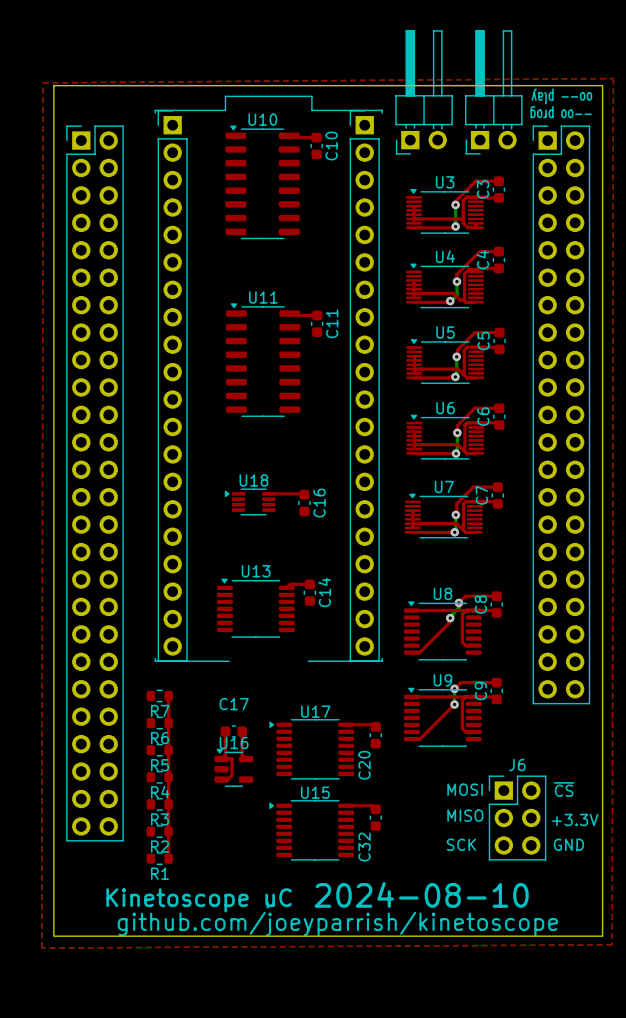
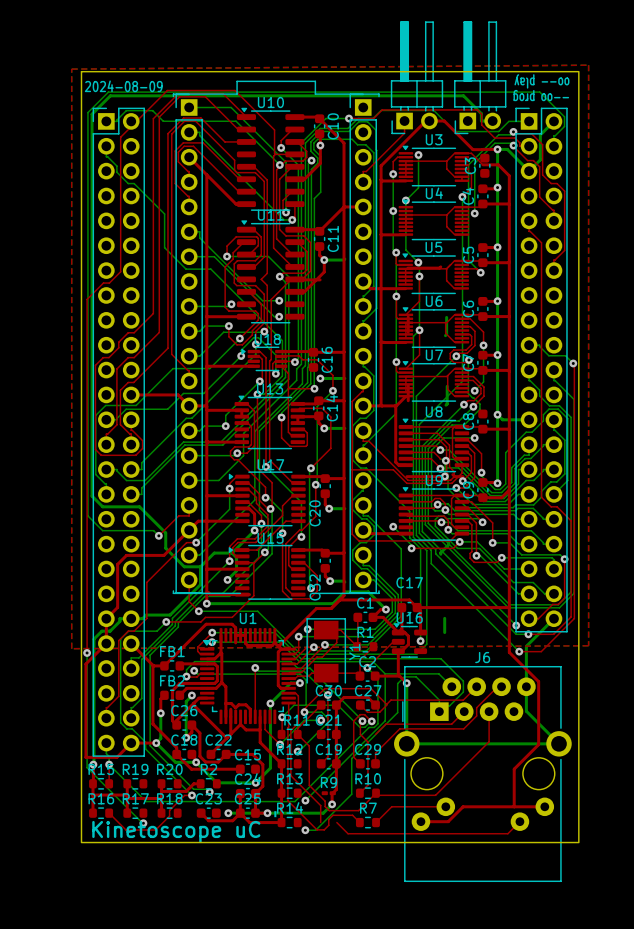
top zone outline: (613, 78) (612, 944) (41, 948) (43, 82) -> (588, 65) (588, 645) (71, 648) (71, 69)
text: none -> 2024-08-09 (123, 86)
bottom track: none -> (189, 107) (231, 107) (286, 162) (286, 212)
top track: none -> (246, 117) (222, 93) (178, 93) (153, 118) (153, 313) (134, 332) (128, 332) (118, 342) (118, 347) (108, 357) (103, 357) (95, 365) (95, 449) (101, 455) (135, 455) (142, 448) (142, 440) (131, 430) (131, 419)
top track: (289, 135) (291, 137) (316, 137) -> (294, 117) (317, 117) (344, 143) (344, 595) (331, 608) (316, 608) (278, 646)
top track: none -> (348, 118) (373, 118) (382, 109) (477, 109) (481, 114) (481, 124) (494, 138) (515, 138) (519, 142) (519, 146) (529, 146)
bottom track: none -> (348, 118) (325, 118) (301, 142) (301, 364) (296, 369) (296, 380) (243, 433) (243, 455) (218, 480) (189, 480)
via: none -> (348, 118)
bottom track: none -> (106, 121) (116, 121) (126, 110) (152, 110) (163, 121) (236, 121) (279, 165)
top track: none -> (404, 121) (404, 133) (366, 171) (363, 171) (363, 182)
bottom track: none -> (492, 121) (481, 121) (481, 113) (463, 95) (110, 95) (92, 114) (92, 496) (102, 506) (139, 506) (165, 532) (165, 548) (184, 566) (200, 566)
bottom track: none -> (529, 121) (508, 121) (498, 131) (454, 131) (433, 110) (381, 110) (373, 118) (358, 118) (348, 128) (320, 128) (305, 143) (305, 365) (302, 368) (302, 383) (254, 431) (254, 500) (199, 555) (189, 555)
bottom track: none -> (553, 121) (540, 134) (540, 159) (529, 171) (507, 149) (497, 149) (497, 483)
top track: none -> (246, 129) (238, 129) (205, 96) (179, 96) (159, 117) (159, 332) (134, 357) (128, 357) (116, 368) (116, 424) (106, 434) (106, 444)
top track: none -> (294, 129) (292, 129) (281, 140) (281, 147)
bottom track: none -> (189, 132) (199, 132) (199, 135) (284, 219) (292, 219)
top track: none -> (513, 131) (515, 134) (531, 134) (542, 144) (542, 174) (551, 183) (557, 183) (564, 191) (564, 250) (553, 260) (553, 270)
bottom track: none -> (513, 131) (510, 134) (498, 134) (468, 164) (468, 260) (480, 272)
via: none -> (513, 131)
top track: none -> (319, 133) (320, 163) (304, 179) (294, 179)
top track: none -> (246, 141) (224, 141) (201, 118) (183, 118) (167, 133) (167, 348) (133, 382) (128, 382) (120, 390) (120, 424) (131, 434) (131, 444)
top track: none -> (294, 141) (306, 151) (306, 157) (302, 161) (285, 161) (276, 169) (276, 238) (292, 254) (294, 254)
bottom track: none -> (106, 146) (106, 156) (116, 166) (116, 172) (128, 183) (134, 183) (164, 214) (164, 247) (186, 269) (210, 269) (282, 340) (282, 376) (264, 394) (257, 394)
via: none -> (320, 145)
top track: none -> (513, 145) (527, 160) (533, 160) (539, 166) (539, 197) (553, 210) (553, 220)
bottom track: none -> (513, 145) (511, 143) (494, 143) (474, 163) (474, 213)
via: none -> (513, 145)
bottom track: none -> (553, 146) (553, 135) (564, 126) (564, 116) (539, 92) (108, 92) (87, 112) (87, 515) (102, 530) (153, 530) (158, 535)
bottom track: none -> (281, 147) (298, 165) (298, 358) (294, 362)
via: none -> (281, 147)
top track: none -> (497, 149) (472, 149) (444, 121) (425, 121) (381, 165) (382, 405)
via: none -> (497, 149)
top track: none -> (275, 154) (274, 130) (235, 90) (167, 90) (120, 137) (120, 271) (109, 283) (103, 283) (87, 299) (87, 652)
top track: none -> (275, 154) (273, 156) (273, 248) (292, 266) (294, 266)
top track: none -> (275, 154) (294, 154)
bottom track: none -> (418, 154) (418, 187) (405, 200) (405, 250) (419, 263) (419, 330)
via: none -> (418, 154)
top track: none -> (189, 157) (236, 204) (246, 204)
top track: none -> (405, 157) (397, 157) (393, 161) (393, 174)
top track: (498, 181) (475, 181) (455, 201) (455, 204) -> none
bottom track: none -> (311, 160) (308, 163) (307, 382) (259, 430) (259, 510) (268, 519) (268, 548) (264, 552)
via: none -> (311, 160)
top track: none -> (446, 161) (405, 161) (405, 176)
top track: none -> (446, 161) (446, 168) (454, 176) (461, 176) (461, 180)
top track: none -> (446, 161) (454, 153) (471, 153) (482, 164) (498, 164) (509, 175) (509, 652) (538, 681) (538, 744) (514, 769) (514, 806)
via: none -> (279, 165)
top track: none -> (246, 166) (254, 166) (267, 180) (267, 273) (261, 279) (267, 285) (267, 328) (264, 331)
top track: none -> (294, 166) (292, 166) (279, 179) (279, 229) (285, 235) (303, 235) (310, 242) (310, 271) (302, 279) (291, 279) (271, 299) (269, 459) (292, 482) (298, 482)
top track: none -> (461, 172) (471, 174) (471, 187) (462, 196)
top track: (498, 197) (466, 197) (463, 200) (463, 223) (467, 227) (475, 227) (475, 223) -> none
bottom track: none -> (393, 174) (393, 249) (396, 252) (396, 413) (363, 445) (363, 455)
via: none -> (393, 174)
top track: none -> (206, 174) (206, 603)
top track: none -> (246, 179) (239, 179) (203, 142) (183, 142) (175, 150) (175, 183) (189, 196) (189, 206)
top track: none -> (381, 179) (405, 180)
bottom track: (455, 204) (455, 226) -> none
via: (455, 204) -> none
top track: (413, 206) (413, 222) -> none
top track: none -> (189, 182) (189, 171) (178, 161) (178, 152) (184, 146) (193, 146) (238, 191) (246, 191)
U3 position: (444, 211) -> (433, 166)
top track: none -> (497, 187) (482, 188)
via: none -> (497, 187)
top track: none -> (294, 191) (291, 191) (283, 200) (283, 209) (286, 212)
top track: (413, 218) (463, 218) -> none
via: none -> (462, 196)
bottom track: none -> (462, 197) (462, 381) (419, 424) (419, 533) (435, 549) (435, 553) (516, 634) (528, 634)
top track: (455, 226) (413, 227) -> none
via: (455, 226) -> none
via: none -> (405, 200)
top track: none -> (294, 204) (294, 217) (292, 219)
top track: none -> (509, 204) (482, 203) (479, 207) (454, 207) (446, 214)
top track: none -> (363, 206) (344, 206) (319, 231) (317, 229) (294, 229)
via: none -> (393, 211)
via: none -> (286, 212)
via: none -> (474, 213)
top track: none -> (446, 214) (446, 226) (454, 234) (461, 234)
top track: none -> (446, 214) (405, 214) (405, 230)
via: none -> (292, 219)
top track: none -> (529, 220) (529, 231) (541, 242) (541, 497) (551, 506) (557, 506) (571, 520) (571, 616) (553, 634) (528, 634)
top track: (498, 251) (479, 251) (456, 274) (456, 281) -> none
top track: none -> (246, 229) (253, 229) (261, 237) (261, 254) (255, 260) (237, 260) (234, 263) (234, 283) (236, 285) (255, 285) (264, 294) (264, 322) (255, 331) (255, 344)
C4 position: (498, 260) -> (482, 196)
bottom track: none -> (189, 231) (199, 231) (199, 237) (262, 300) (279, 300)
top track: none -> (381, 234) (405, 234)
top track: (498, 268) (479, 268) (475, 271) -> none
top track: (478, 269) (469, 269) (464, 273) (464, 301) (475, 302) -> none
top track: none -> (246, 242) (243, 242) (233, 252) (233, 259) (225, 267) (225, 307) (228, 311) (255, 311) (258, 313) (258, 320) (239, 338)
top track: none -> (294, 242) (297, 242) (307, 251) (307, 269) (303, 273) (283, 273) (279, 276)
top track: none -> (319, 246) (319, 255) (324, 260) (324, 272) (304, 291) (294, 291)
top track: none -> (497, 247) (482, 247)
via: none -> (497, 247)
top track: (413, 280) (413, 297) -> none
bottom track: (456, 281) (456, 295) (450, 301) -> none
via: (456, 281) -> none
top track: none -> (396, 252) (396, 263) (405, 264)
via: none -> (396, 252)
U4 position: (444, 285) -> (433, 219)
top track: none -> (246, 254) (249, 254) (258, 245) (256, 236) (236, 236) (227, 246) (227, 256)
bottom track: none -> (189, 256) (214, 256) (274, 316) (279, 316)
bottom track: none -> (227, 256) (268, 256) (288, 276) (288, 379) (222, 445) (184, 445) (141, 488) (141, 494) (131, 494)
via: none -> (227, 256)
bottom track: none -> (344, 259) (324, 260)
via: none -> (324, 260)
top track: (413, 293) (453, 293) (459, 299) (464, 299) -> none
top track: none -> (509, 261) (454, 261) (446, 268) (405, 268) (405, 284)
via: none -> (418, 262)
top track: none -> (246, 266) (254, 266) (264, 257) (264, 181) (255, 172) (237, 172) (234, 170) (234, 160) (195, 121) (184, 121) (171, 134) (171, 354) (189, 370) (189, 381)
via: (450, 301) -> none
top track: none -> (446, 268) (446, 280) (454, 288) (461, 288)
top track: none -> (461, 268) (476, 268) (480, 272)
via: none -> (480, 272)
bottom track: none -> (279, 276) (285, 282) (285, 377) (220, 442) (183, 442) (145, 480) (126, 480) (116, 469) (106, 469)
via: none -> (279, 276)
top track: none -> (419, 276) (419, 301) (405, 314)
via: none -> (419, 276)
top track: none -> (363, 281) (370, 288) (405, 288)
C11 position: (317, 323) -> (319, 238)
top track: none -> (246, 291) (248, 291) (261, 304) (261, 321) (242, 344) (236, 344) (228, 336) (228, 326)
top track: (499, 332) (474, 332) (457, 349) (456, 356) -> none
top track: none -> (396, 296) (396, 317) (405, 318)
via: none -> (396, 296)
via: none -> (279, 300)
top track: none -> (497, 301) (482, 301)
via: none -> (497, 301)
C5 position: (499, 341) -> (482, 255)
bottom track: none -> (231, 304) (229, 306) (189, 306)
via: none -> (231, 304)
bottom track: none -> (363, 306) (363, 295) (373, 286) (373, 152) (365, 144) (357, 144) (352, 139) (317, 139) (313, 143) (313, 149) (320, 156) (320, 192) (314, 198) (314, 388)
top track: (499, 349) (497, 347) (467, 347) (464, 350) (464, 375) -> none
top track: none -> (206, 316) (246, 316)
via: none -> (279, 316)
via: (456, 356) -> none
top track: none -> (509, 316) (454, 314) (446, 322) (405, 322) (405, 338)
top track: none -> (461, 318) (470, 318) (483, 332) (483, 345)
U11 position: (263, 360) -> (270, 271)
U5 position: (445, 361) -> (433, 273)
top track: none -> (445, 322) (445, 333) (454, 342) (461, 342)
bottom track: none -> (228, 326) (204, 326) (199, 331) (189, 331)
via: none -> (228, 326)
top track: none -> (461, 326) (470, 326) (474, 331) (474, 345) (467, 353) (459, 353) (456, 356)
top track: (414, 369) (458, 369) (467, 378) (476, 378) -> none
top track: none -> (419, 330) (419, 355) (405, 368)
bottom track: none -> (419, 330) (413, 336) (413, 537) (426, 550) (426, 644) (416, 654) (300, 654) (257, 611) (198, 611)
via: none -> (419, 330)
bottom track: none -> (264, 331) (223, 332) (199, 356) (189, 356)
via: none -> (264, 331)
bottom track: none -> (363, 331) (363, 320) (376, 308) (375, 130) (367, 121) (358, 121) (349, 131) (321, 131) (310, 141) (310, 151) (317, 158) (317, 163) (311, 169) (310, 383) (281, 412) (281, 417)
top track: none -> (461, 334) (469, 334) (471, 336) (471, 344) (466, 350) (453, 350) (450, 353) (450, 358) (453, 362) (466, 362) (468, 359)
top track: (455, 376) (414, 378) -> none
via: (455, 376) -> none
bottom track: none -> (239, 338) (209, 368) (173, 368) (136, 405) (105, 405) (95, 415) (95, 474) (106, 483) (106, 494)
via: none -> (239, 338)
top track: none -> (381, 342) (405, 342)
bottom track: none -> (255, 344) (255, 354) (191, 418) (186, 418) (141, 462) (141, 469) (131, 469)
via: none -> (255, 344)
bottom track: none -> (483, 345) (483, 381) (474, 390)
via: none -> (483, 345)
bottom track: none -> (529, 345) (539, 345) (548, 355) (565, 355) (573, 363)
top track: none -> (253, 351) (259, 351) (266, 357) (266, 466)
top track: none -> (281, 351) (344, 352)
top track: none -> (497, 354) (482, 355)
via: none -> (497, 354)
via: none -> (241, 356)
top track: none -> (253, 356) (259, 356) (262, 359) (262, 378) (259, 381)
top track: none -> (281, 356) (298, 355) (302, 359) (317, 359) (332, 375) (332, 390)
bottom track: none -> (363, 356) (363, 366) (373, 375) (373, 410) (365, 418) (360, 418) (352, 425) (352, 459) (360, 468) (366, 468) (409, 511) (409, 537) (420, 548) (420, 641)
bottom track: none -> (456, 356) (416, 396) (416, 535) (431, 550) (431, 563) (519, 651)
via: none -> (456, 356)
bottom track: none -> (468, 359) (468, 393) (479, 404) (479, 409) (464, 425) (452, 425) (428, 448) (428, 523) (509, 604) (558, 604) (571, 592) (571, 417) (559, 405) (549, 405) (539, 395) (539, 390) (529, 380) (529, 370)
via: none -> (468, 359)
top track: none -> (294, 362) (275, 361) (272, 363) (272, 370) (275, 373)
via: none -> (294, 362)
top track: none -> (396, 362) (396, 371) (405, 372)
via: none -> (396, 362)
top track: none -> (573, 363) (574, 618) (541, 651) (519, 651)
via: none -> (573, 363)
top track: (499, 408) (474, 408) (457, 425) (457, 432) -> none
top track: none -> (253, 366) (206, 366)
top track: none -> (281, 366) (288, 373) (288, 432) (291, 435) (297, 435)
bottom track: none -> (553, 370) (553, 380) (574, 399) (574, 593) (559, 607) (508, 607) (425, 524) (425, 447) (451, 421) (459, 421) (473, 406)
C6 position: (499, 416) -> (482, 308)
top track: none -> (509, 371) (454, 368) (446, 376) (405, 376) (405, 392)
bottom track: none -> (275, 373) (275, 355) (258, 337) (253, 337) (241, 350) (241, 356) (203, 393) (183, 393) (167, 409) (126, 409) (116, 419) (106, 419)
via: none -> (275, 373)
top track: none -> (447, 375) (447, 389) (454, 396) (461, 396)
top track: none -> (461, 376) (473, 376) (483, 387) (483, 396) (473, 406)
bottom track: none -> (320, 378) (344, 378)
via: none -> (320, 378)
top track: (499, 425) (497, 422) (467, 422) (464, 425) (464, 451) -> none
top track: none -> (461, 380) (473, 380) (480, 388) (480, 393) (474, 400) (468, 400) (464, 404)
bottom track: none -> (259, 381) (225, 415) (225, 426) (204, 426) (199, 430) (189, 430)
via: none -> (259, 381)
top track: none -> (363, 381) (363, 391) (352, 401) (352, 534) (358, 540) (450, 540) (457, 533) (461, 533)
via: (457, 432) -> none
top track: none -> (288, 388) (314, 388)
via: none -> (314, 388)
bottom track: none -> (332, 390) (317, 406) (315, 484)
via: none -> (332, 390)
U6 position: (445, 437) -> (433, 327)
via: none -> (474, 390)
top track: none -> (257, 394) (257, 468) (272, 482) (272, 507) (268, 508) (259, 500) (259, 494) (248, 482) (242, 482)
via: none -> (257, 394)
top track: none -> (131, 394) (178, 394) (189, 405) (206, 406)
top track: none -> (405, 396) (395, 406)
top track: (414, 444) (457, 444) (466, 453) (476, 453) -> none
top track: none -> (344, 401) (318, 400) (315, 403) (297, 403)
top track: none -> (241, 403) (247, 403) (254, 411) (254, 445) (246, 453) (237, 453)
top track: (414, 453) (456, 453) -> none
via: (456, 453) -> none
bottom track: none -> (464, 404) (422, 446) (422, 531) (516, 625)
via: none -> (464, 404)
top track: none -> (363, 405) (395, 406)
top track: none -> (395, 406) (395, 462) (398, 465) (405, 465)
via: none -> (473, 406)
top track: none -> (206, 409) (241, 410) (241, 416)
top track: none -> (297, 410) (299, 408) (322, 408) (330, 417) (330, 448) (310, 468)
bottom track: none -> (497, 414) (502, 419) (529, 419)
via: none -> (497, 414)
top track: none -> (281, 417) (281, 437) (290, 446) (306, 446) (307, 432) (303, 429) (297, 429)
via: none -> (281, 417)
bottom track: none -> (553, 419) (553, 430) (564, 440) (564, 474) (556, 481) (550, 481) (541, 491) (541, 497) (533, 504) (515, 504) (513, 507) (466, 507) (448, 488) (448, 474)
top track: none -> (241, 423) (247, 423) (251, 426) (251, 444) (249, 446) (234, 446) (230, 451) (230, 456) (234, 459) (238, 459) (265, 487) (265, 497)
top track: none -> (297, 423) (297, 416) (318, 415) (318, 422) (324, 428)
via: none -> (225, 426)
top track: none -> (405, 426) (480, 426) (482, 429) (509, 429)
top track: none -> (454, 426) (452, 429) (452, 456) (454, 458) (461, 458)
bottom track: none -> (324, 428) (344, 428)
via: none -> (324, 428)
top track: none -> (363, 430) (363, 441) (369, 441) (408, 480) (450, 480) (454, 476) (454, 471) (449, 467) (449, 445) (437, 433) (405, 433)
top track: (497, 487) (473, 487) (456, 503) (455, 514) -> none
bottom track: none -> (474, 438) (443, 438) (431, 450) (431, 507) (435, 510) (445, 510)
via: none -> (474, 438)
top track: none -> (405, 439) (439, 439) (446, 447) (448, 474)
top track: none -> (461, 439) (467, 439) (481, 453) (481, 472)
top track: none -> (206, 441) (241, 442)
top track: (268, 493) (304, 494) -> none
C7 position: (497, 495) -> (482, 362)
bottom track: none -> (529, 444) (529, 455) (524, 455) (511, 467) (511, 482) (501, 492) (491, 492) (449, 450) (440, 450)
bottom track: none -> (553, 444) (543, 444) (530, 458) (525, 458) (515, 468) (515, 483) (502, 495) (490, 495) (454, 459) (440, 459)
top track: none -> (405, 446) (436, 446) (440, 450)
top track: none -> (461, 446) (467, 446) (474, 453) (474, 477) (464, 488) (456, 488)
U18 position: (250, 501) -> (264, 358)
C16 position: (304, 503) -> (313, 359)
via: none -> (440, 450)
top track: (497, 503) (495, 501) (465, 501) (463, 503) (463, 530) (456, 523) (412, 523) -> none
top track: none -> (405, 452) (434, 452) (440, 459)
top track: none -> (461, 452) (467, 452) (471, 456) (471, 472) (462, 481)
bottom track: none -> (237, 453) (234, 455) (189, 455)
via: none -> (237, 453)
top track: (412, 510) (412, 527) -> none
top track: none -> (405, 458) (431, 458) (440, 468)
U7 position: (443, 515) -> (433, 381)
top track: none -> (461, 465) (461, 473) (451, 483) (406, 483) (393, 469) (352, 469)
bottom track: none -> (266, 466) (301, 502) (301, 536)
via: none -> (266, 466)
bottom track: none -> (310, 468) (311, 588)
via: none -> (310, 468)
bottom track: none -> (440, 468) (458, 467) (489, 498) (504, 498) (518, 484) (518, 469) (529, 469)
via: none -> (440, 468)
bottom track: none -> (553, 469) (543, 469) (533, 480) (526, 480) (505, 501) (483, 501) (462, 481)
bottom track: none -> (481, 472) (481, 475) (495, 489) (500, 489) (505, 484) (505, 452) (526, 432) (532, 432) (543, 420) (543, 414) (548, 409) (558, 409) (567, 418) (567, 480) (553, 494)
via: none -> (481, 472)
top track: none -> (242, 476) (236, 476) (229, 483) (229, 488)
top track: none -> (298, 476) (344, 478)
bottom track: none -> (363, 480) (363, 491) (352, 500) (352, 509) (361, 518) (366, 518) (374, 526) (374, 534) (366, 542) (360, 542) (352, 550) (352, 559) (361, 568) (367, 568) (395, 596) (395, 613) (371, 636) (298, 636)
via: none -> (462, 481)
top track: none -> (482, 482) (497, 483)
via: none -> (497, 483)
top track: none -> (315, 484) (315, 516) (285, 543) (285, 587) (292, 594) (298, 594)
via: none -> (315, 484)
bottom track: none -> (229, 488) (229, 509) (196, 542)
via: none -> (229, 488)
bottom track: none -> (456, 488) (472, 504) (508, 504) (518, 494) (529, 494)
via: none -> (456, 488)
top track: none -> (242, 489) (248, 489) (256, 497) (256, 503) (267, 514) (267, 526) (255, 538) (237, 538) (229, 546) (229, 561)
top track: none -> (509, 490) (501, 497) (482, 497) (480, 495) (405, 495)
top track: none -> (325, 493) (325, 504) (329, 508)
top track: none -> (242, 495) (206, 495)
top track: none -> (298, 495) (292, 495) (282, 505) (282, 515) (255, 542) (238, 542) (232, 547) (232, 552) (236, 556) (242, 556)
top track: none -> (454, 495) (451, 498) (451, 524) (454, 527) (461, 527)
bottom track: none -> (265, 497) (268, 497) (282, 511) (282, 533)
via: none -> (265, 497)
top track: none -> (242, 502) (248, 502) (261, 515) (261, 523)
top track: none -> (405, 501) (431, 501) (435, 498) (440, 498) (445, 503) (445, 510)
top track: none -> (461, 501) (471, 501) (492, 522) (492, 542)
top track: none -> (437, 504) (434, 508) (405, 508)
bottom track: none -> (437, 504) (447, 503) (454, 510) (515, 510) (518, 508) (533, 508) (543, 519) (553, 519)
via: none -> (437, 504)
top track: none -> (189, 505) (189, 515) (178, 515) (158, 535)
bottom track: none -> (363, 505) (363, 515) (368, 515) (401, 548) (401, 616) (366, 651) (317, 651) (313, 647)
top track: none -> (242, 508) (248, 508) (254, 514) (254, 530)
bottom track: none -> (329, 508) (344, 508)
via: none -> (329, 508)
top track: none -> (461, 508) (468, 508) (482, 522)
bottom track: none -> (270, 508) (272, 553) (229, 596) (204, 596) (150, 655) (150, 745) (193, 789) (207, 789) (209, 791)
via: none -> (270, 508)
via: none -> (445, 510)
bottom track: none -> (445, 510) (448, 514) (513, 514) (518, 519) (529, 519)
top track: none -> (405, 514) (407, 516) (444, 516) (448, 520) (448, 529)
top track: none -> (461, 514) (467, 514) (476, 523) (476, 555)
top track: none -> (242, 521) (198, 521) (164, 555) (126, 555) (117, 564) (117, 607) (106, 618) (106, 643) (85, 664) (85, 757) (116, 757) (131, 743) (156, 743)
top track: none -> (298, 521) (285, 521) (257, 550) (242, 550)
top track: none -> (405, 520) (441, 522)
top track: none -> (461, 520) (467, 520) (471, 524) (470, 558) (474, 562) (497, 562) (501, 557)
bottom track: none -> (441, 522) (449, 522) (457, 530) (531, 530) (543, 544) (553, 544)
via: none -> (441, 522)
bottom track: none -> (482, 522) (479, 518) (446, 518) (444, 516) (438, 516) (435, 519) (435, 526) (457, 548) (479, 548) (513, 582) (533, 582) (544, 593) (553, 593)
via: none -> (482, 522)
bottom track: none -> (261, 523) (261, 547) (258, 549) (258, 557) (222, 593) (203, 593) (175, 621) (175, 625) (141, 659) (141, 698) (131, 707) (131, 718)
via: none -> (261, 523)
top track: (309, 584) (290, 584) (286, 587) -> none
bottom track: none -> (393, 526) (411, 545) (411, 548)
via: none -> (393, 526)
bottom track: none -> (254, 530) (232, 553)
via: none -> (254, 530)
top track: none -> (363, 530) (366, 533) (405, 533)
bottom track: none -> (448, 529) (452, 533) (508, 533) (518, 544) (529, 544)
via: none -> (448, 529)
C14 position: (309, 592) -> (318, 408)
top track: none -> (282, 533) (282, 591) (290, 598) (309, 598) (317, 591) (317, 575) (304, 562) (298, 562)
via: none -> (282, 533)
top track: (496, 596) (465, 596) (458, 602) -> none
via: none -> (158, 535)
top track: none -> (301, 536) (299, 536) (288, 547) (288, 565) (292, 569) (298, 569)
via: none -> (301, 536)
via: (458, 602) -> none
top track: none -> (459, 541) (453, 548) (411, 548)
bottom track: none -> (459, 541) (477, 541) (504, 569) (529, 569)
via: none -> (459, 541)
C8 position: (496, 604) -> (482, 421)
top track: none -> (196, 542) (186, 542) (146, 582) (146, 618) (134, 631) (128, 631) (118, 640) (118, 696) (106, 707) (106, 718)
via: none -> (196, 542)
bottom track: none -> (492, 542) (509, 542) (521, 554) (560, 554) (564, 559)
via: none -> (492, 542)
U13 position: (255, 608) -> (269, 422)
top track: (411, 610) (494, 610) (496, 612) -> none
top track: (466, 610) (462, 614) (462, 642) (465, 645) (473, 645) -> none
via: none -> (411, 548)
top track: none -> (298, 550) (322, 550) (325, 553) (344, 552)
bottom track: none -> (232, 553) (214, 553) (200, 566)
bottom track: none -> (232, 553) (236, 557) (236, 570) (227, 579)
top track: none -> (264, 552) (254, 562) (242, 562)
via: none -> (264, 552)
top track: (450, 618) (449, 623) (419, 652) (411, 652) -> none
via: (450, 618) -> none
bottom track: none -> (363, 555) (363, 565) (369, 565) (398, 594) (398, 614) (368, 644) (324, 644)
bottom track: none -> (476, 555) (480, 555) (518, 593) (529, 593)
via: none -> (476, 555)
bottom track: none -> (501, 557) (552, 557) (553, 559) (553, 569)
via: none -> (501, 557)
top track: none -> (564, 559) (564, 598) (558, 604) (552, 604) (538, 618) (529, 618)
via: none -> (564, 559)
bottom track: none -> (229, 561) (172, 618) (172, 624) (138, 657) (131, 657) (131, 668)
via: none -> (229, 561)
top track: none -> (253, 562) (253, 595) (232, 617) (205, 617) (200, 621) (166, 621)
U8 position: (442, 630) -> (433, 445)
bottom track: none -> (200, 566) (200, 584) (170, 615) (146, 615) (142, 618) (119, 618) (119, 621) (110, 631) (101, 631) (93, 639) (93, 764)
top track: none -> (325, 568) (325, 576) (330, 581)
top track: none -> (242, 569) (206, 569)
top track: none -> (189, 579) (189, 601) (198, 611)
via: none -> (227, 579)
bottom track: none -> (363, 579) (373, 579) (392, 598) (392, 612) (375, 629) (307, 629)
bottom track: none -> (330, 581) (344, 582)
via: none -> (330, 581)
via: none -> (311, 588)
top track: none -> (206, 592) (210, 594) (249, 594)
top track: none -> (339, 599) (409, 599) (420, 611) (420, 632)
bottom track: none -> (206, 603) (333, 603) (344, 591) (368, 591) (385, 609)
via: none -> (206, 603)
top track: none -> (401, 607) (401, 628) (398, 632)
top track: none -> (417, 607) (509, 607)
top track: none -> (385, 609) (380, 609) (372, 617) (383, 617) (398, 632)
via: none -> (385, 609)
via: none -> (198, 611)
top track: (496, 682) (460, 682) (454, 688) -> none
top track: none -> (357, 617) (357, 646) (340, 630) (326, 630)
C1: none -> (365, 617)
via: (454, 688) -> none
bottom track: none -> (553, 618) (526, 646) (526, 711) (559, 743) (406, 743) (406, 683)
C9 position: (496, 690) -> (482, 490)
bottom track: none -> (166, 621) (157, 631) (128, 631) (120, 639) (120, 722) (126, 728) (132, 728) (145, 742) (145, 749) (191, 795)
via: none -> (166, 621)
R7 position: (159, 695) -> (367, 822)
top track: (168, 695) (168, 858) -> none
top track: (411, 696) (494, 696) (496, 699) -> none
top track: (465, 696) (462, 700) (462, 728) (465, 732) (473, 732) -> none
via: none -> (516, 625)
top track: none -> (307, 629) (307, 646) (295, 658) (288, 658)
via: none -> (307, 629)
top track: none -> (336, 630) (336, 642) (322, 657) (316, 657) (301, 672) (288, 673)
top track: none -> (212, 632) (197, 647) (197, 651) (200, 654) (207, 654)
bottom track: none -> (212, 632) (274, 632) (300, 658) (440, 658) (463, 681) (463, 692) (449, 705) (439, 705)
via: none -> (212, 632)
top track: none -> (398, 632) (404, 632) (408, 636) (408, 644) (401, 651) (398, 651) (398, 674) (406, 683)
top track: (454, 704) (420, 739) (411, 739) -> none
via: (454, 704) -> none
via: none -> (528, 634)
top track: none -> (221, 635) (221, 652)
top track: none -> (235, 635) (245, 635) (245, 643) (247, 645) (272, 645) (274, 642)
top track: none -> (298, 636) (298, 650) (295, 654) (288, 654)
via: none -> (298, 636)
R7 name position: R7 (160, 711) -> R7 (368, 808)
via: none -> (420, 641)
top track: none -> (398, 641) (393, 641) (367, 667)
bottom track: none -> (212, 642) (279, 642) (299, 661) (373, 661) (385, 673)
via: none -> (212, 642)
top track: none -> (235, 642) (235, 627) (232, 624) (206, 624) (164, 665) (153, 665) (131, 643)
top track: none -> (274, 642) (281, 649)
U9 position: (442, 717) -> (433, 513)
top track: none -> (324, 644) (301, 668) (288, 668)
via: none -> (324, 644)
top track: none -> (313, 647) (297, 663) (288, 663)
via: none -> (313, 647)
top track: none -> (373, 646) (360, 660) (360, 676) (357, 673) (311, 673) (308, 676) (288, 678)
top track: none -> (281, 649) (278, 652) (278, 685) (281, 688) (288, 688)
R6: (159, 723) -> none
Y1: none -> (326, 650)
top track: (346, 724) (373, 724) (375, 726) -> none
via: none -> (519, 651)
top track: none -> (221, 652) (214, 658) (207, 658)
top track: none -> (221, 652) (221, 682)
bottom track: none -> (87, 652) (87, 767) (143, 823)
via: none -> (87, 652)
top track: (225, 731) (225, 755) (221, 759) (232, 759) (232, 775) (227, 779) (221, 779) -> none
C17 position: (233, 731) -> (409, 607)
top track: (242, 731) (242, 755) (246, 759) -> none
C20 position: (375, 735) -> (325, 486)
top track: none -> (152, 665) (152, 724) (176, 747) (176, 754) (191, 769) (240, 769)
FB1: none -> (172, 665)
top track: none -> (179, 665) (181, 663) (214, 663) (217, 666) (217, 680) (214, 683) (179, 683) (172, 690) (172, 720) (176, 725) (176, 720) (198, 698) (207, 698)
top track: none -> (255, 667) (255, 716)
bottom track: none -> (255, 667) (258, 671) (304, 671) (327, 695)
via: none -> (255, 667)
bottom track: none -> (367, 667) (377, 678) (377, 723) (374, 727) (369, 727) (294, 801) (146, 801) (109, 764) (106, 743)
via: none -> (367, 667)
bottom track: none -> (194, 670) (197, 674) (300, 674) (306, 680) (306, 705)
via: none -> (194, 670)
top track: none -> (207, 673) (200, 673) (196, 677) (186, 676)
U17 position: (311, 749) -> (267, 498)
R5: (159, 750) -> none
bottom track: none -> (385, 673) (438, 673) (451, 686)
bottom track: none -> (385, 673) (385, 720) (305, 800)
U1: none -> (247, 676)
C2: none -> (367, 676)
top track: none -> (375, 676) (399, 676)
bottom track: none -> (186, 676) (186, 669) (194, 661) (291, 661) (297, 668) (309, 668) (362, 721)
via: none -> (186, 676)
top track: none -> (221, 682) (225, 686) (225, 716)
top track: none -> (221, 682) (216, 688) (186, 688) (179, 695)
bottom track: none -> (299, 683) (290, 683) (270, 703) (270, 768) (255, 782) (216, 782) (196, 762) (175, 762) (156, 743) (160, 738) (160, 713)
via: none -> (299, 683)
via: none -> (406, 683)
top track: none -> (476, 686) (463, 700) (390, 700) (386, 704)
top track: none -> (501, 686) (497, 686) (476, 707) (476, 715) (463, 728) (399, 728) (375, 753) (375, 763)
J6 name position: J6 (517, 765) -> J6 (482, 657)
U16 position: (233, 767) -> (409, 640)
top track: none -> (288, 693) (295, 693) (298, 695) (298, 723) (290, 730) (290, 775) (320, 805) (320, 822)
top track: none -> (164, 695) (160, 698) (160, 713)
FB2: none -> (172, 695)
bottom track: none -> (191, 695) (186, 701) (186, 737)
via: none -> (191, 695)
top track: none -> (327, 695) (327, 757) (321, 763)
via: none -> (327, 695)
J6 footprint: [488, 775, 547, 861] -> [394, 666, 572, 882]
R4: (159, 777) -> none
top track: none -> (193, 703) (226, 738)
top track: none -> (225, 703) (231, 703) (235, 707) (238, 704) (245, 704) (250, 709) (250, 716)
via: none -> (270, 703)
top track: none -> (288, 703) (287, 800) (317, 829) (324, 829) (328, 825) (328, 819) (333, 815) (352, 815) (359, 822)
top track: none -> (386, 704) (379, 712) (367, 712) (360, 705)
top track: none -> (386, 704) (370, 688) (324, 688) (304, 708) (304, 712)
top track: none -> (321, 705) (297, 728) (297, 734) (309, 746) (309, 785) (325, 801) (325, 806) (329, 810) (358, 810) (376, 793) (378, 795) (435, 795) (489, 741) (489, 711)
C30: none -> (328, 705)
C27: none -> (367, 705)
top track: none -> (375, 705) (367, 697) (343, 697) (336, 705) (336, 789) (332, 793) (332, 804)
top track: none -> (230, 709) (230, 734)
text: MOSI (465, 789) -> none
text: ~{CS} (564, 789) -> none
bottom track: none -> (439, 711) (439, 700) (416, 676) (404, 676) (397, 683) (397, 712) (351, 758) (351, 794) (315, 830) (305, 830)
top track: none -> (464, 711) (451, 724) (385, 724) (375, 734)
bottom track: none -> (304, 712) (321, 712) (327, 718) (327, 722) (297, 751)
via: none -> (304, 712)
via: none -> (160, 713)
top track: none -> (260, 716) (260, 742) (281, 763) (281, 822) (249, 822) (240, 813)
top track: none -> (265, 716) (265, 729) (280, 744)
top track: none -> (282, 717) (281, 734)
bottom track: none -> (282, 717) (294, 705) (337, 705) (359, 727) (365, 727) (371, 721)
via: none -> (282, 717)
bottom track: none -> (321, 720) (304, 720) (280, 744)
via: none -> (321, 720)
top track: none -> (362, 721) (360, 723) (360, 734) (367, 742) (367, 785) (359, 793)
via: none -> (362, 721)
top track: none -> (371, 721) (364, 714) (360, 714) (353, 721) (353, 757) (360, 763)
via: none -> (371, 721)
R3: (159, 804) -> none
top track: (346, 805) (372, 805) (375, 809) -> none
C26: none -> (184, 725)
top track: none -> (260, 729) (246, 729) (240, 724) (210, 754)
text: MISO (465, 815) -> none
R11: none -> (289, 734)
C21: none -> (328, 734)
C32 position: (375, 817) -> (325, 560)
text: +3.3V (575, 819) -> none
top track: none -> (186, 737) (191, 732) (191, 725) (199, 733) (199, 756) (205, 762) (218, 762) (226, 754) (252, 754) (262, 764) (262, 786) (255, 793) (255, 813) (267, 813)
via: none -> (186, 737)
via: none -> (156, 743)
via: none -> (280, 744)
U15 position: (311, 830) -> (267, 572)
R2 position: (159, 831) -> (208, 783)
via: none -> (297, 751)
C18: none -> (184, 754)
C22: none -> (218, 754)
text: SCK (461, 844) -> none
text: GND (568, 844) -> none
R2 name position: R2 (159, 846) -> R2 (208, 769)
via: none -> (196, 762)
R12: none -> (289, 763)
C19: none -> (328, 763)
C29: none -> (367, 763)
top track: none -> (93, 764) (92, 813)
via: none -> (93, 764)
top track: none -> (109, 764) (109, 783)
via: none -> (109, 764)
C15: none -> (247, 769)
R1 position: (159, 858) -> (365, 646)
via: none -> (255, 782)
R15: none -> (101, 783)
top track: none -> (127, 783) (127, 813)
R19: none -> (135, 783)
top track: none -> (161, 783) (161, 813)
R20: none -> (169, 783)
top track: none -> (200, 783) (193, 783) (186, 791) (161, 791)
R1 name position: R1 (159, 873) -> R1 (365, 632)
via: none -> (209, 791)
R13: none -> (289, 793)
R9: none -> (328, 793)
R10: none -> (367, 793)
top track: none -> (240, 793) (240, 813)
C24: none -> (247, 793)
top track: none -> (92, 795) (127, 795)
top track: none -> (191, 795) (184, 795) (169, 810) (169, 816) (155, 830) (125, 830) (109, 813)
via: none -> (191, 795)
top track: none -> (127, 798) (161, 798)
via: none -> (305, 800)
bottom track: none -> (332, 804) (323, 813) (228, 813)
via: none -> (332, 804)
text: 2024-08-10 (421, 894) -> none
top track: none -> (445, 806) (391, 806) (376, 822)
top track: none -> (544, 806) (463, 806) (448, 821) (420, 821)
text position: Kinetoscope uC (199, 900) -> Kinetoscope uC (176, 831)
R16: none -> (101, 813)
R17: none -> (135, 813)
R18: none -> (169, 813)
top track: none -> (201, 813) (208, 820) (232, 820) (240, 813)
C23: none -> (208, 813)
via: none -> (228, 813)
C25: none -> (247, 813)
via: none -> (267, 813)
top track: none -> (519, 821) (507, 833) (348, 833) (336, 822)
via: none -> (143, 823)
R14: none -> (289, 822)
via: none -> (305, 830)
text: github.com/joeyparrish/kinetoscope (337, 924) -> none

